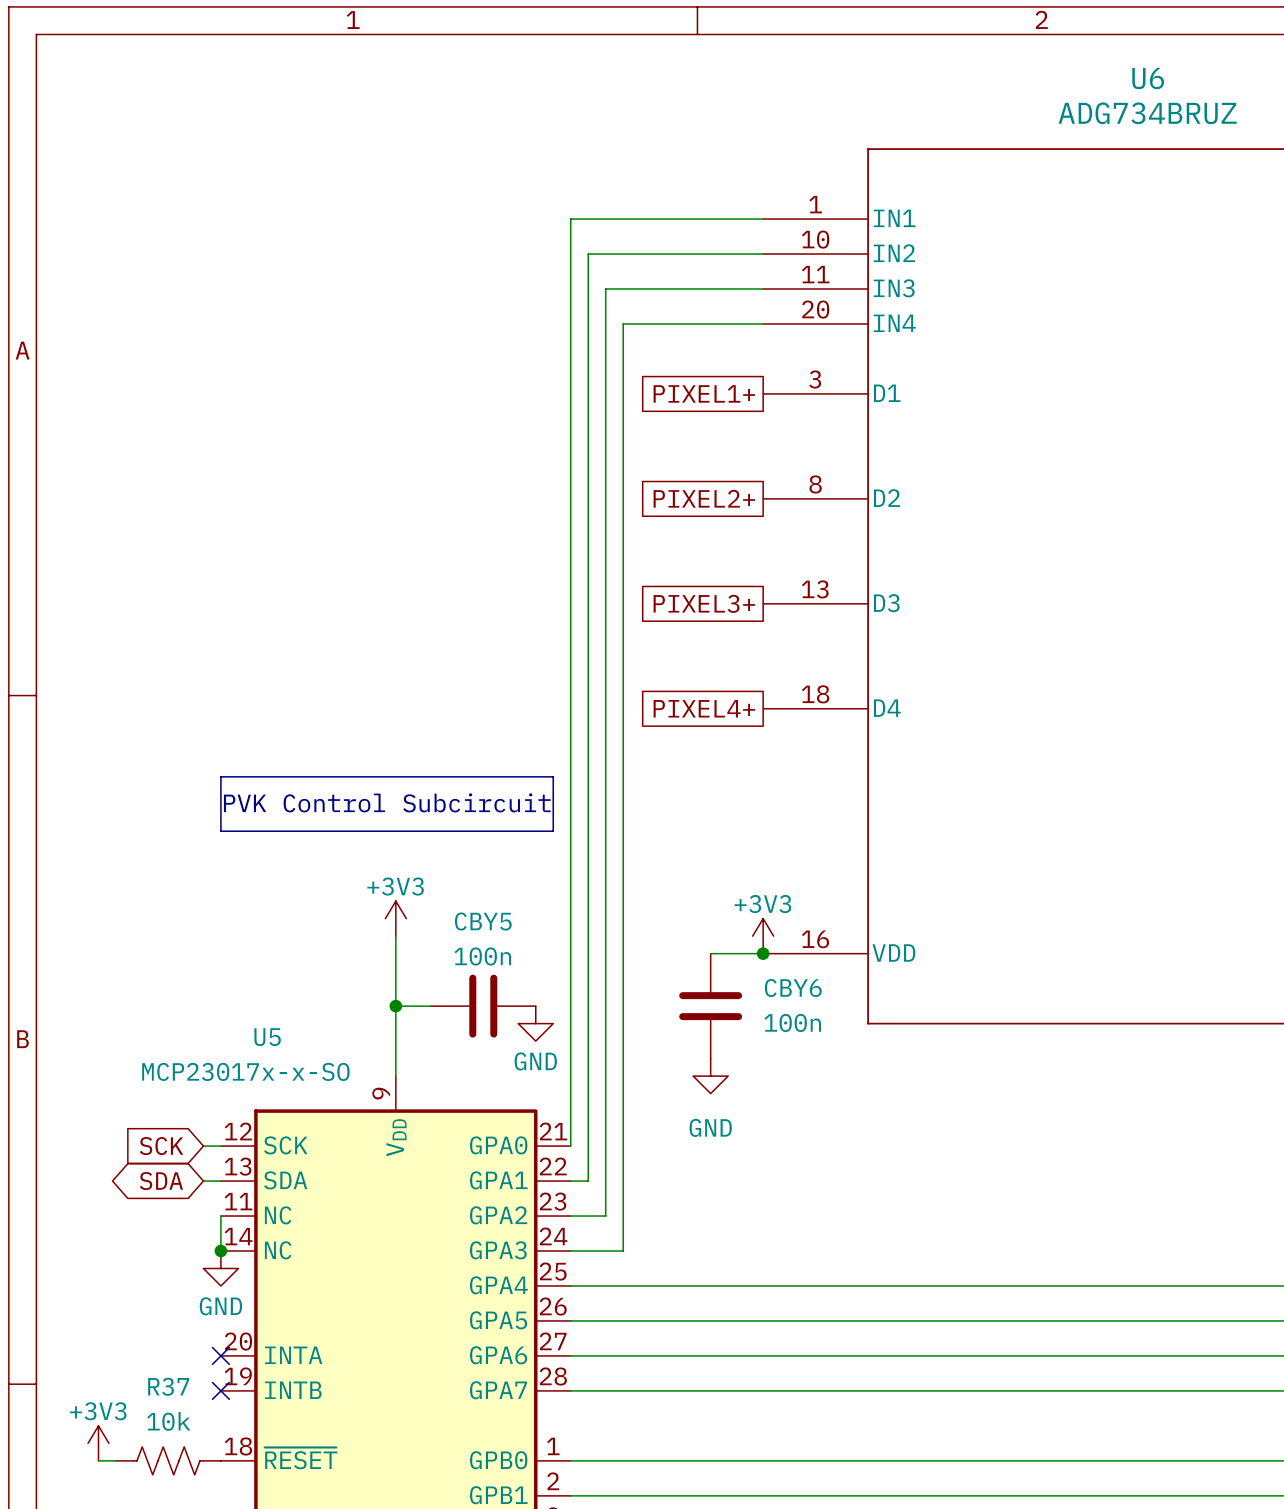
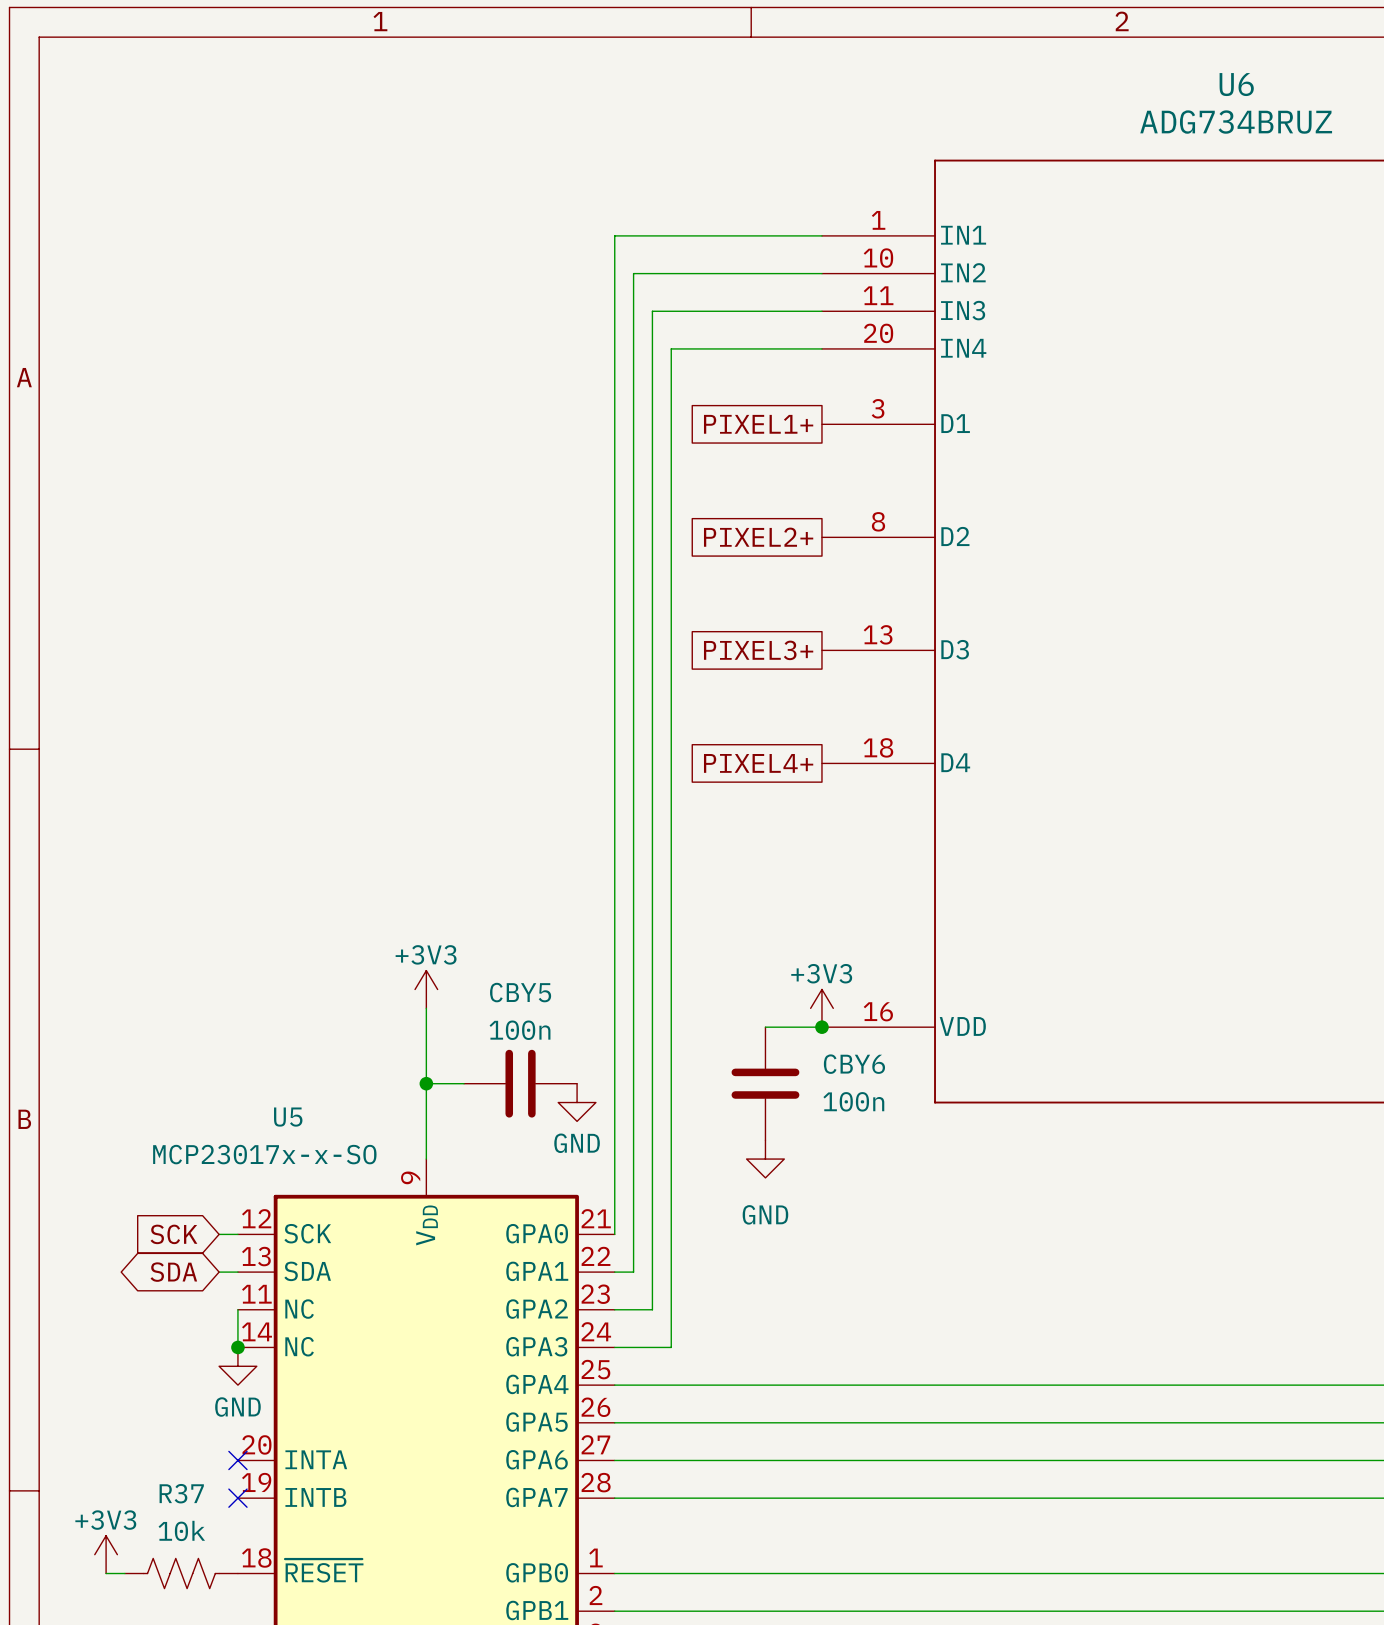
line: (220, 776) (553, 776) (553, 831) (220, 831) (220, 776) -> none
text: PVK Control Subcircuit (387, 802) -> none

